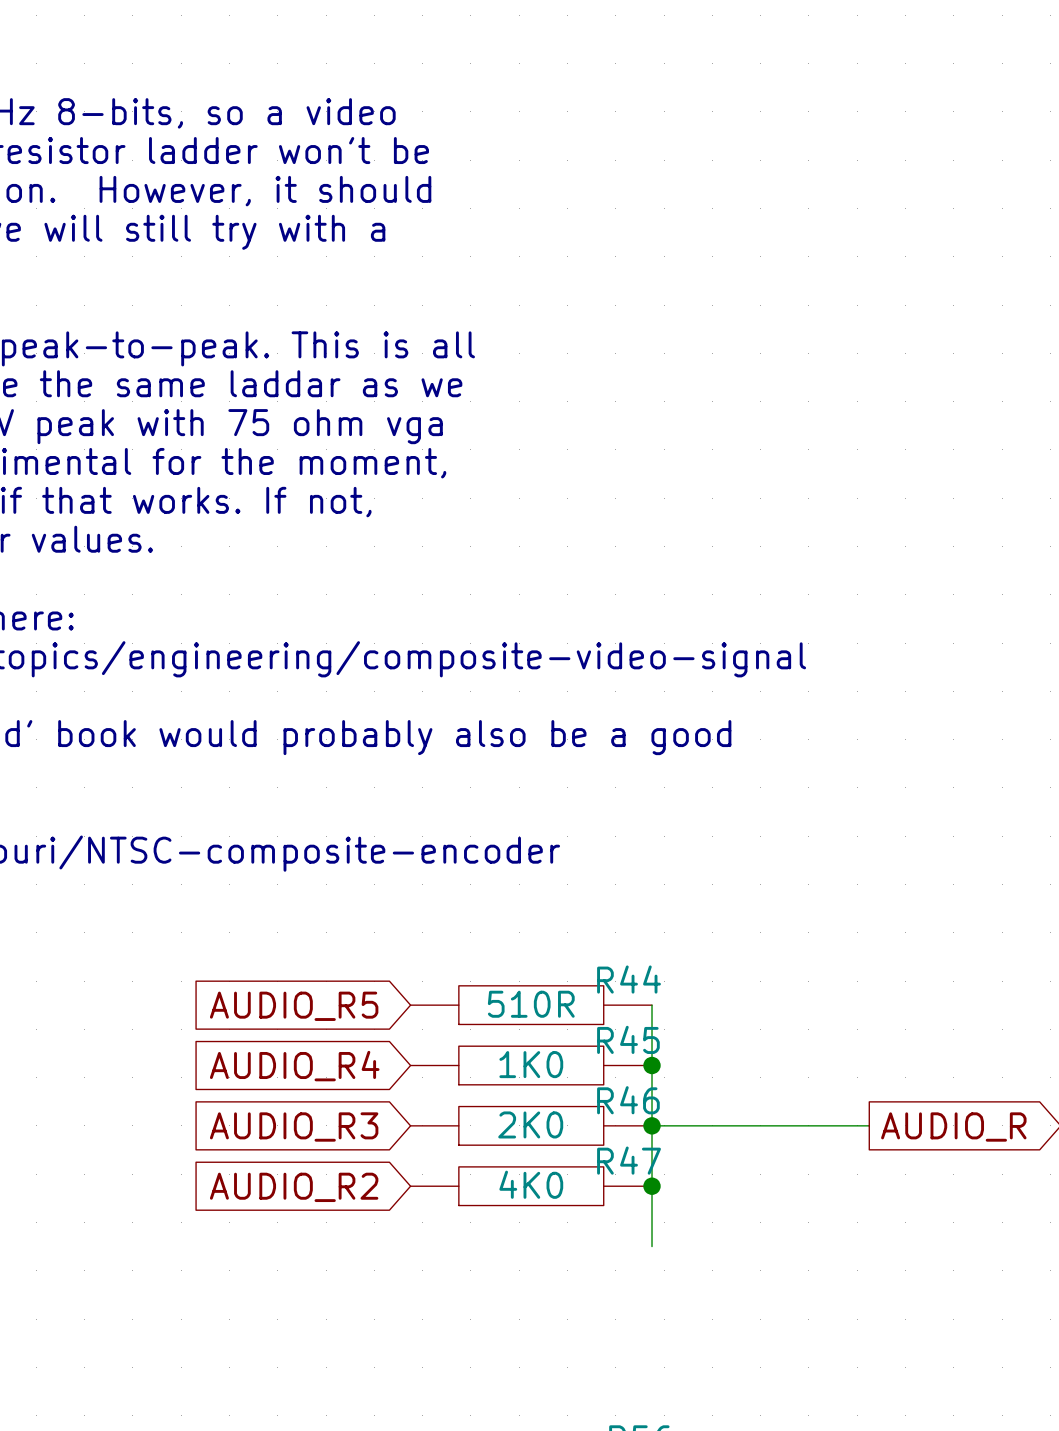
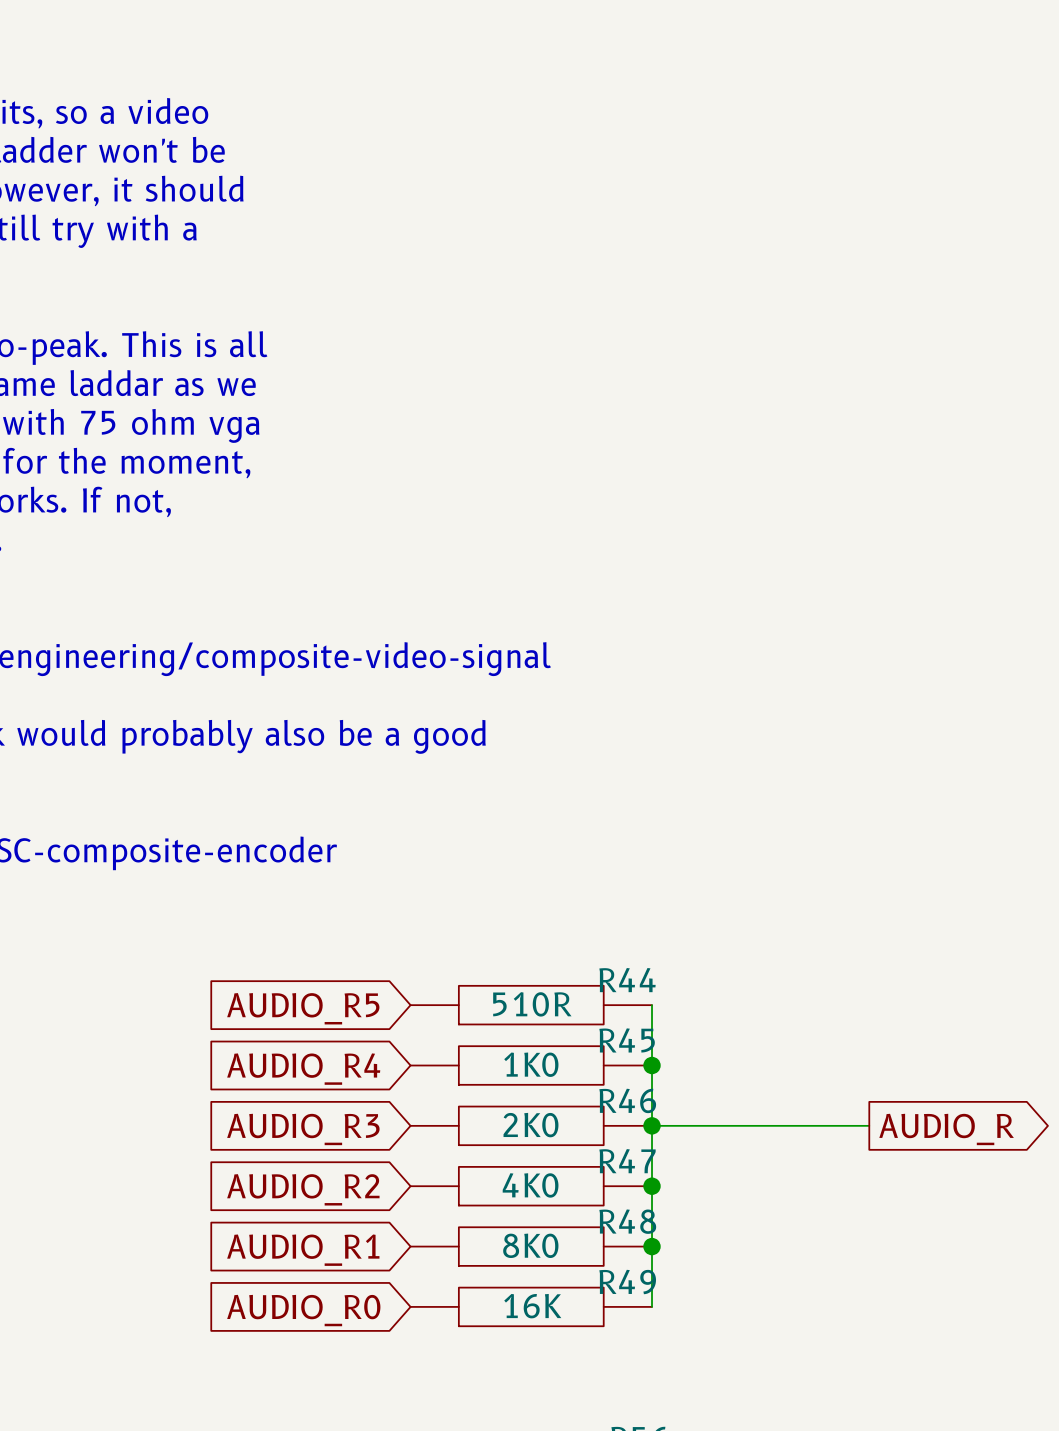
R48: none -> 8K0 (531, 1246)
wire: none -> (652, 1246) (652, 1306)
junction: none -> (652, 1246)
global label: none -> AUDIO_R1 (303, 1250)
R49: none -> 16K (531, 1306)
global label: none -> AUDIO_R0 (303, 1310)

